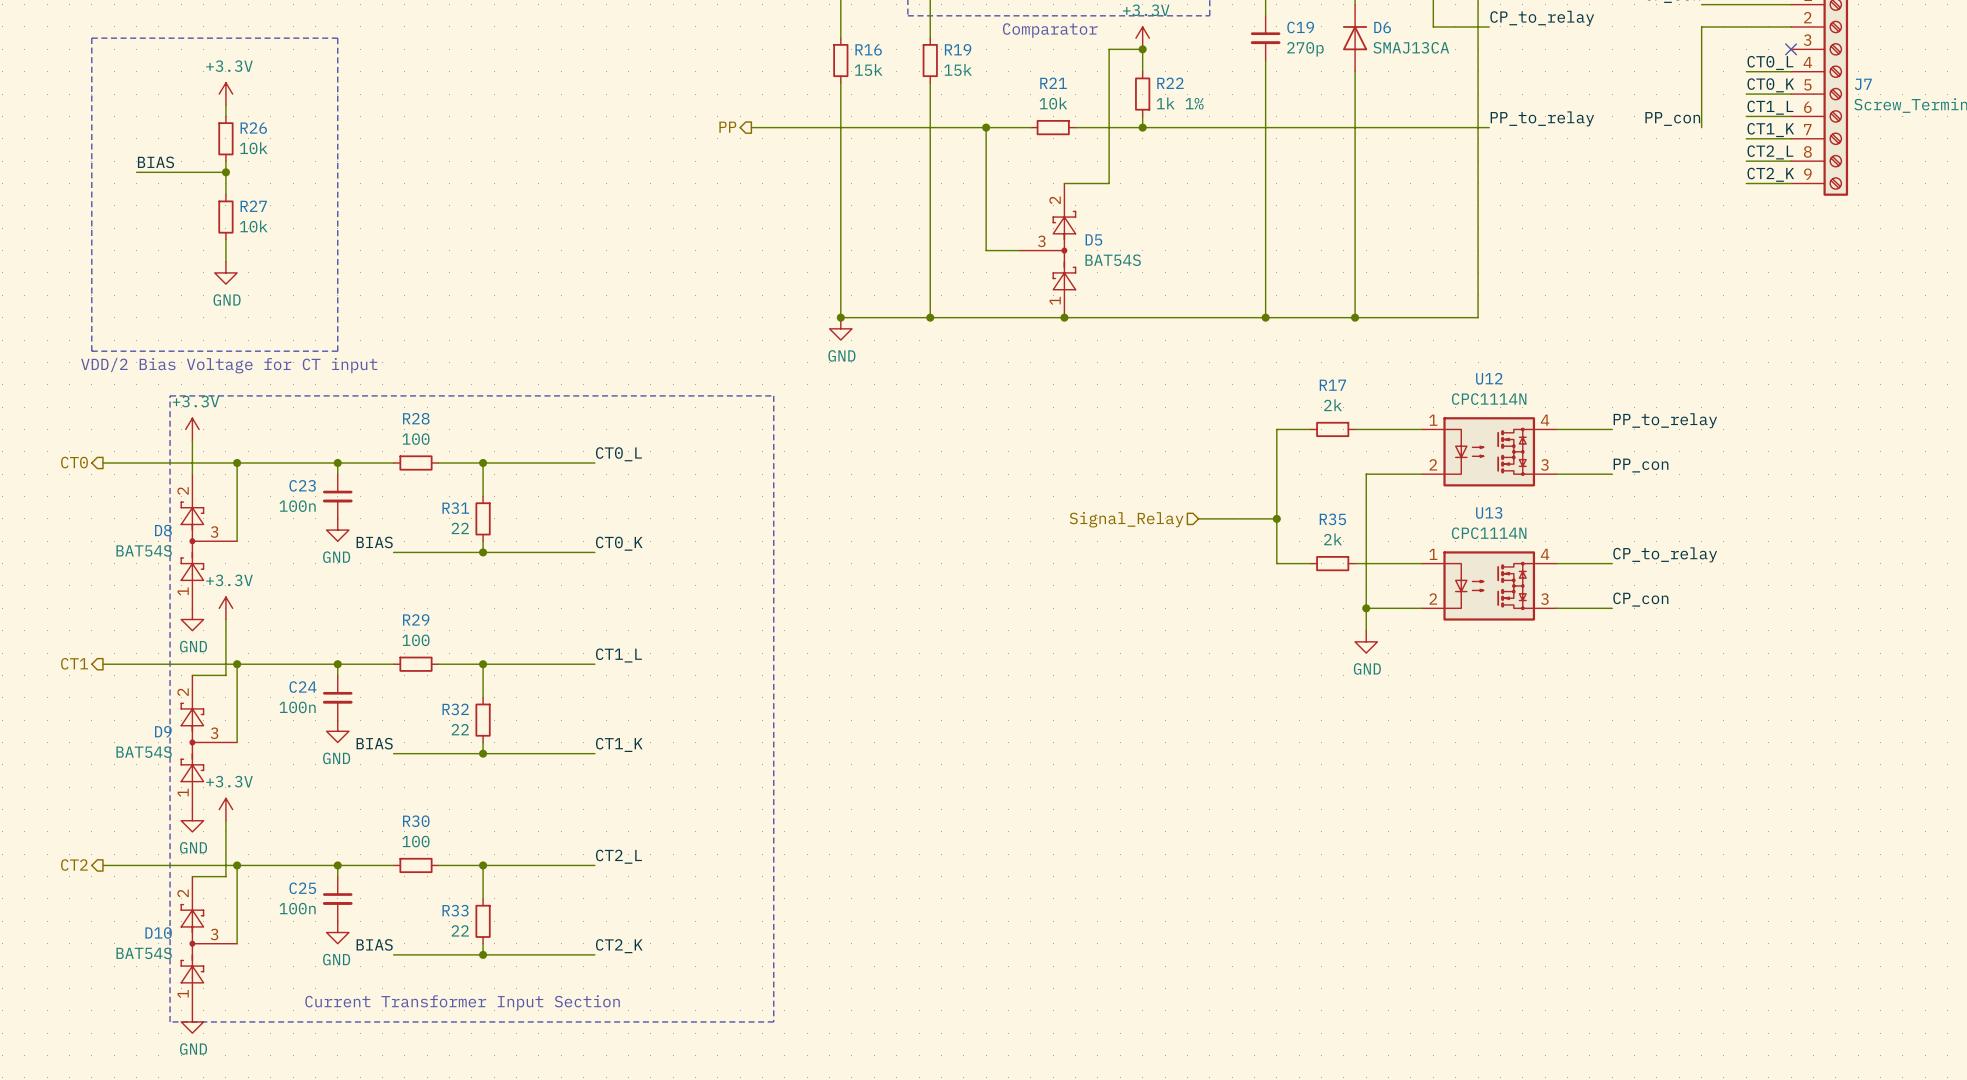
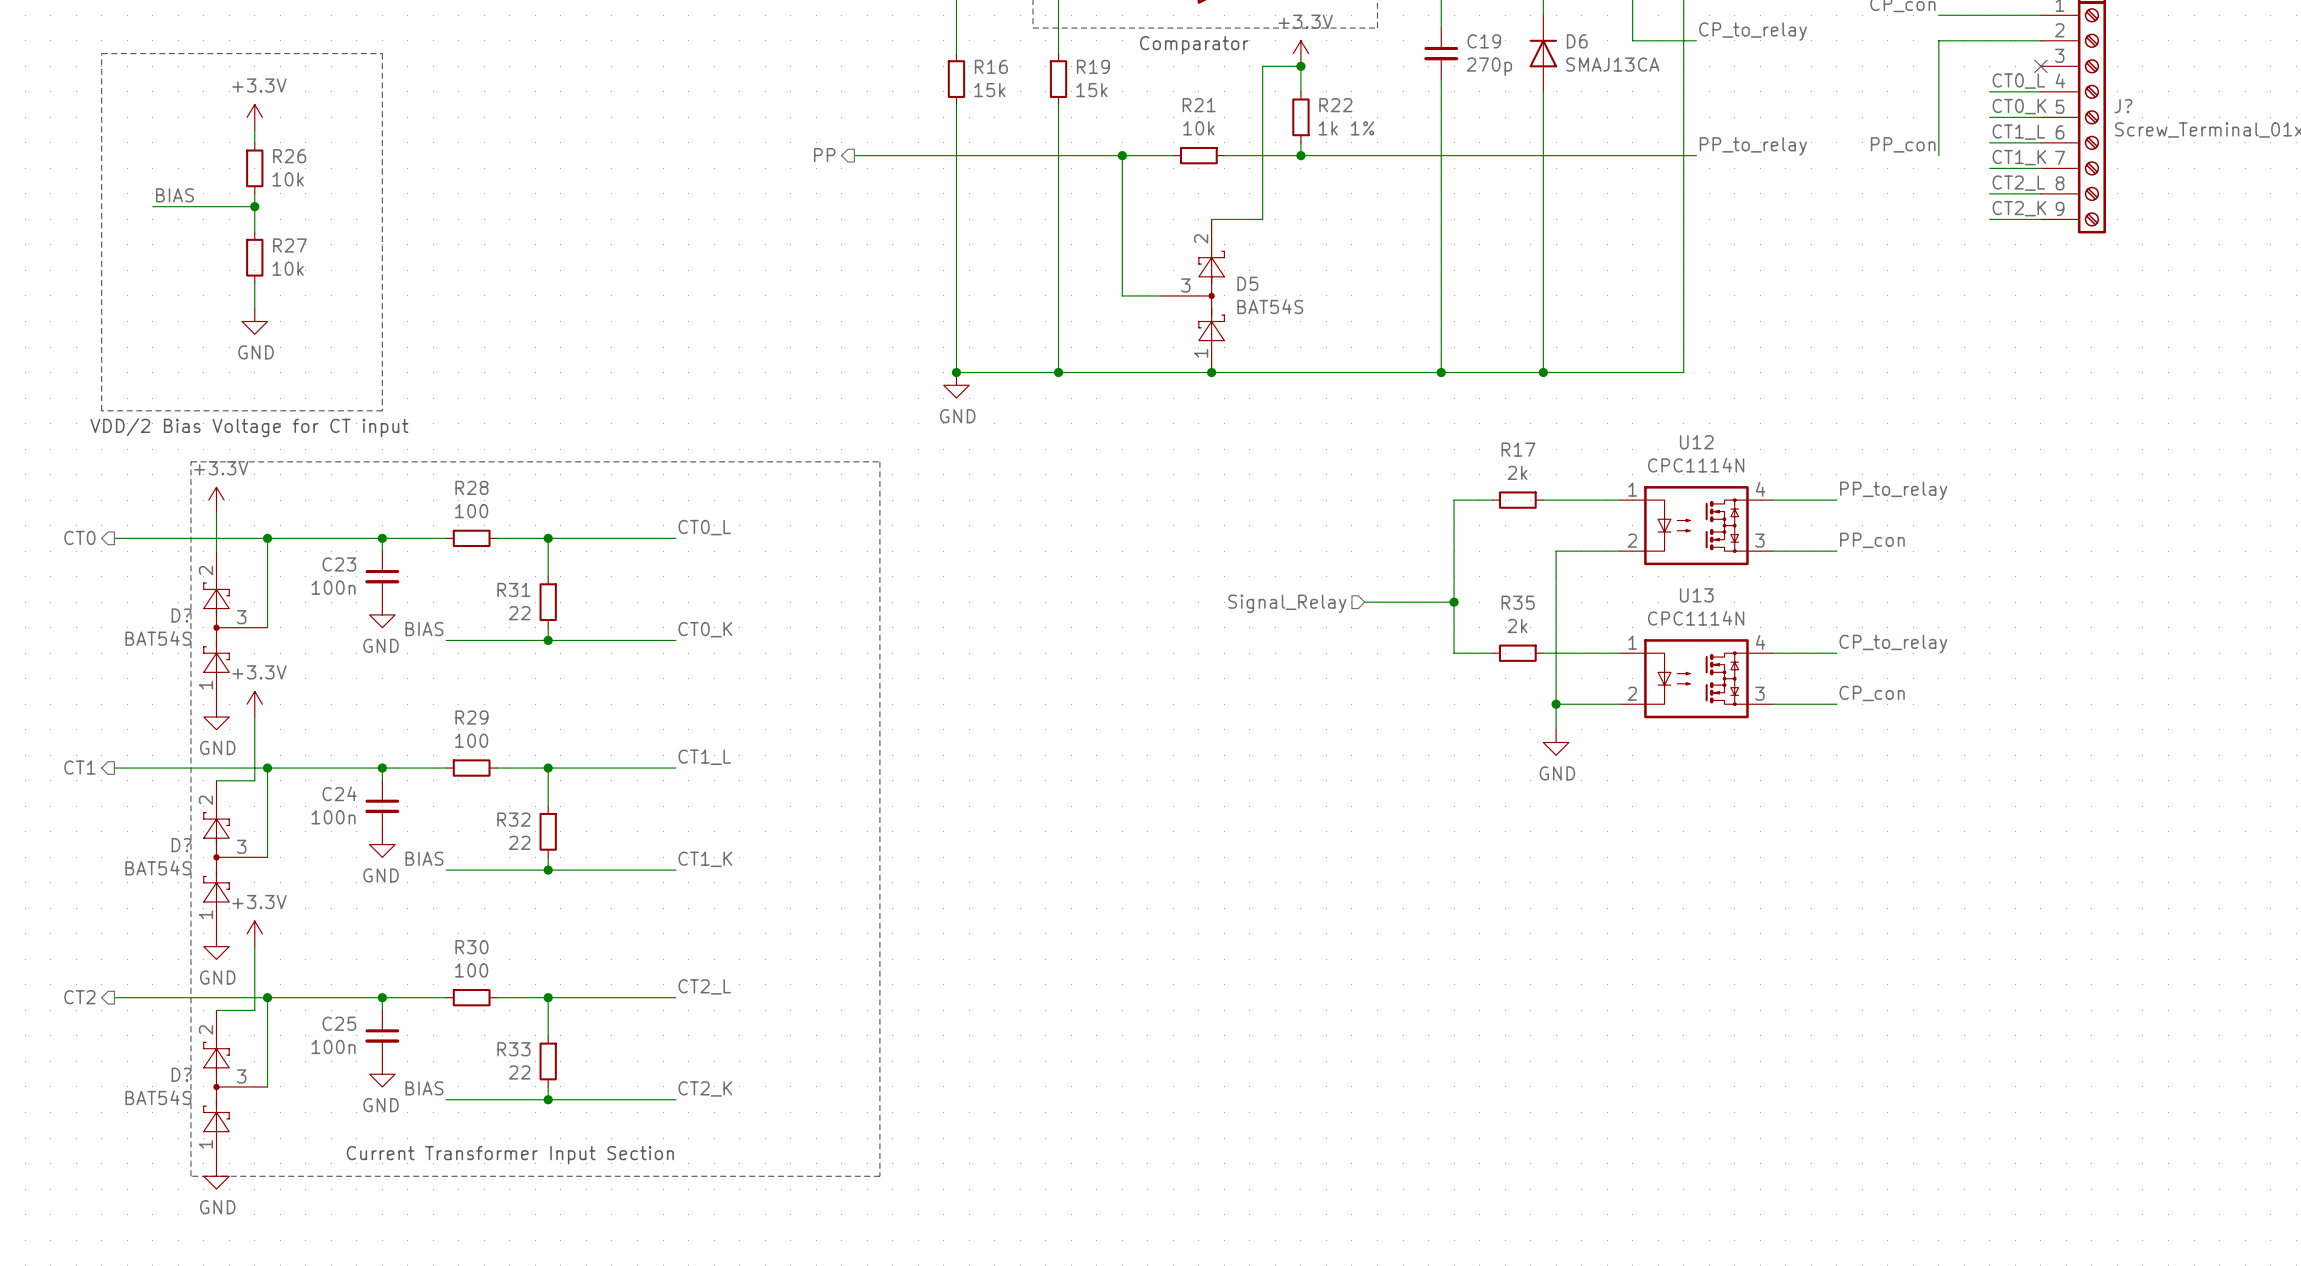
J7 name: J7 (1863, 84) -> J? (2123, 106)
D8 name: D8 (163, 530) -> D? (181, 615)
D9 name: D9 (163, 731) -> D? (181, 845)
D10 name: D10 (158, 933) -> D? (181, 1074)

